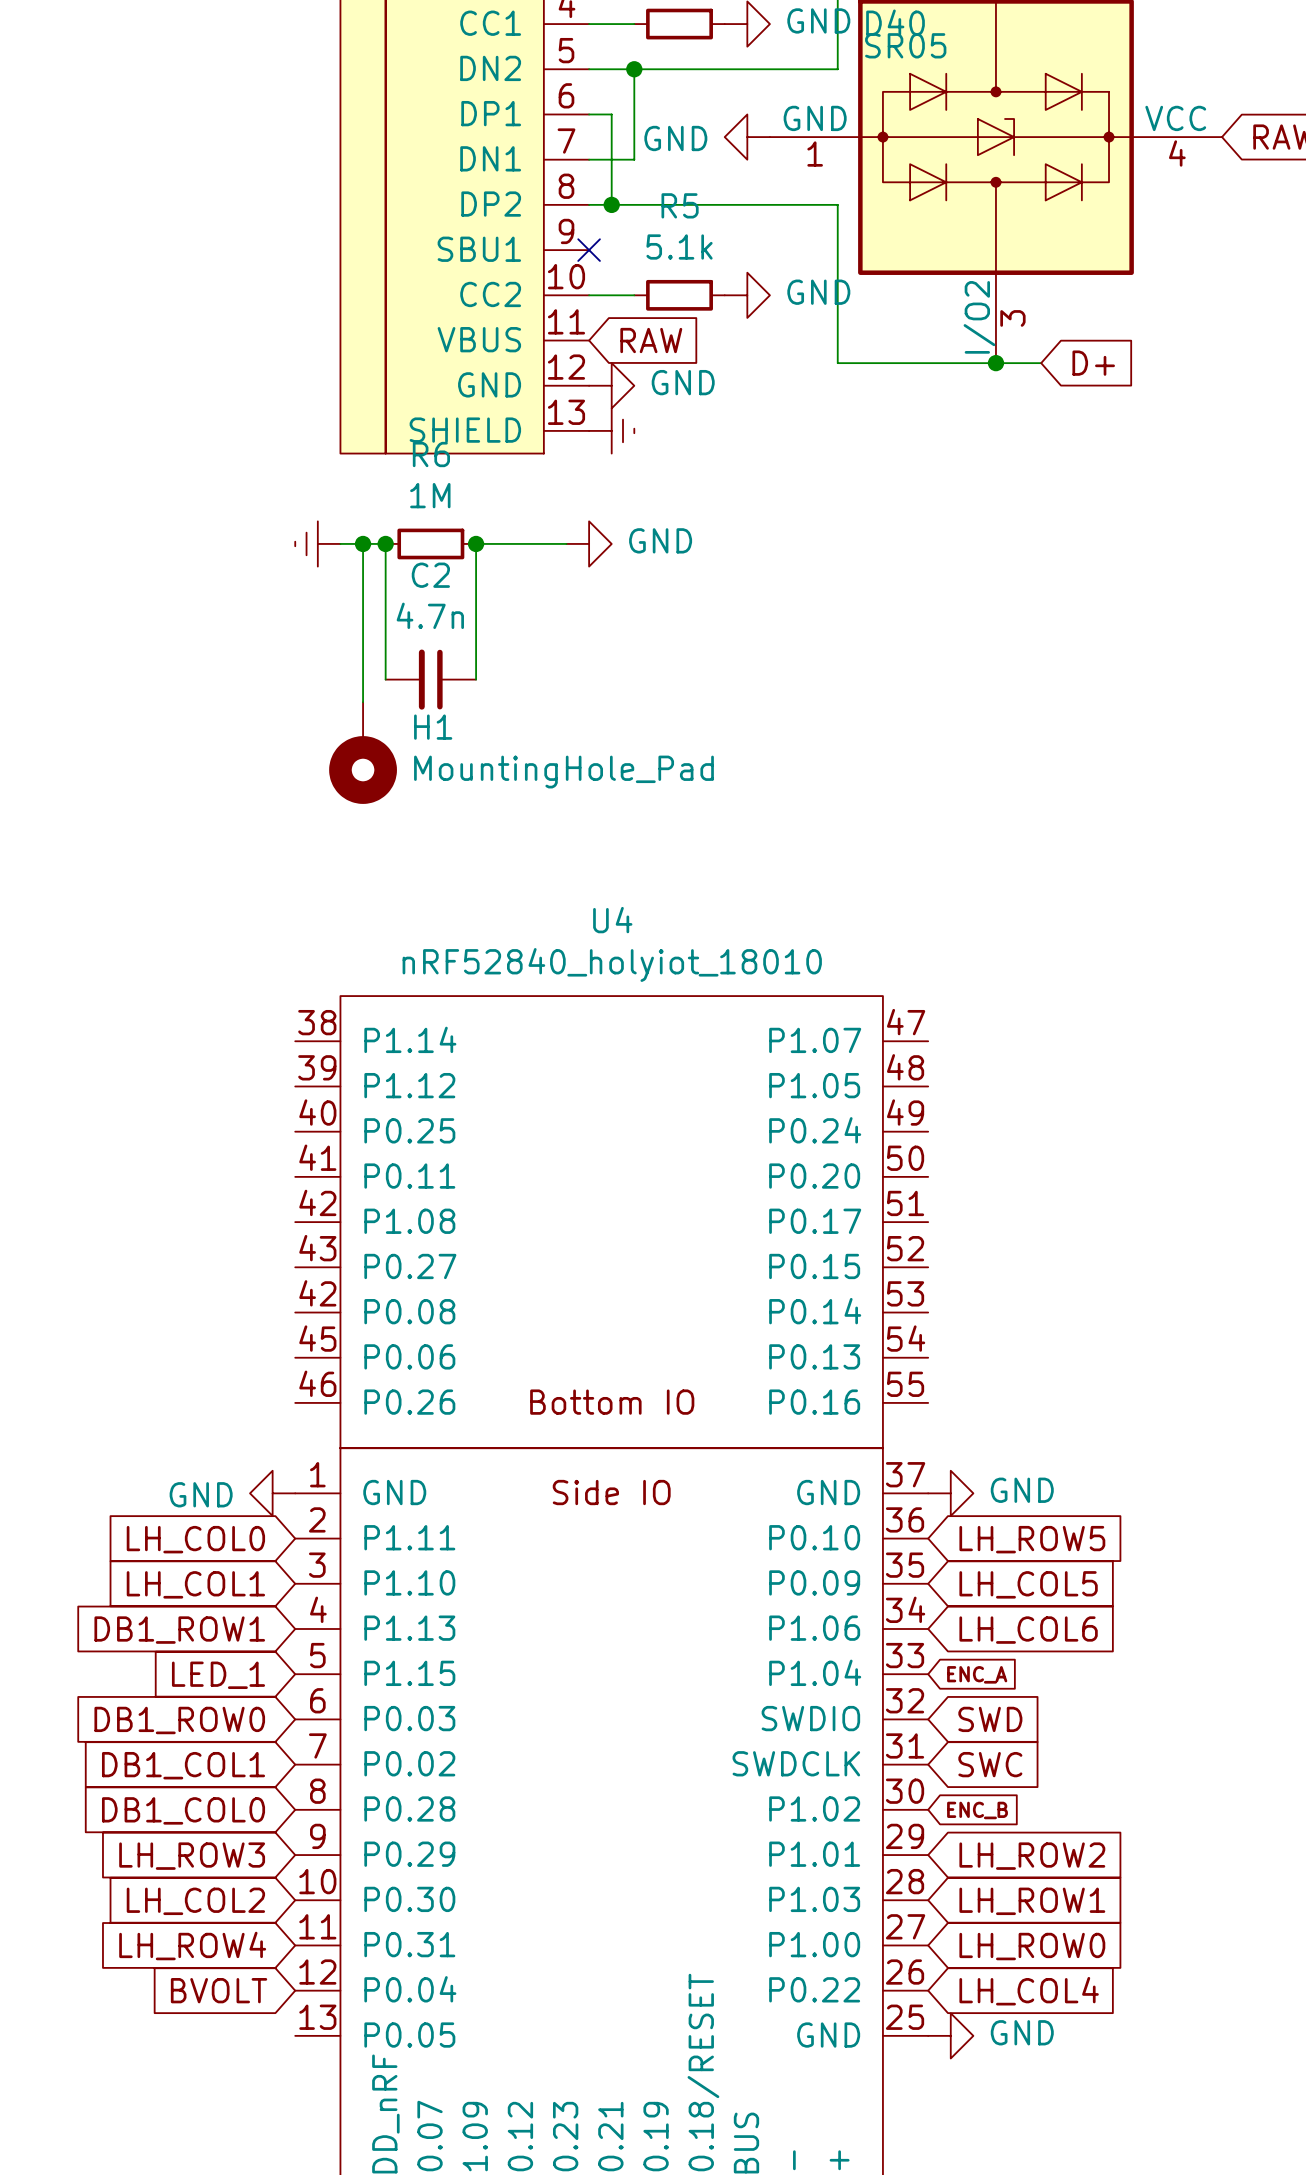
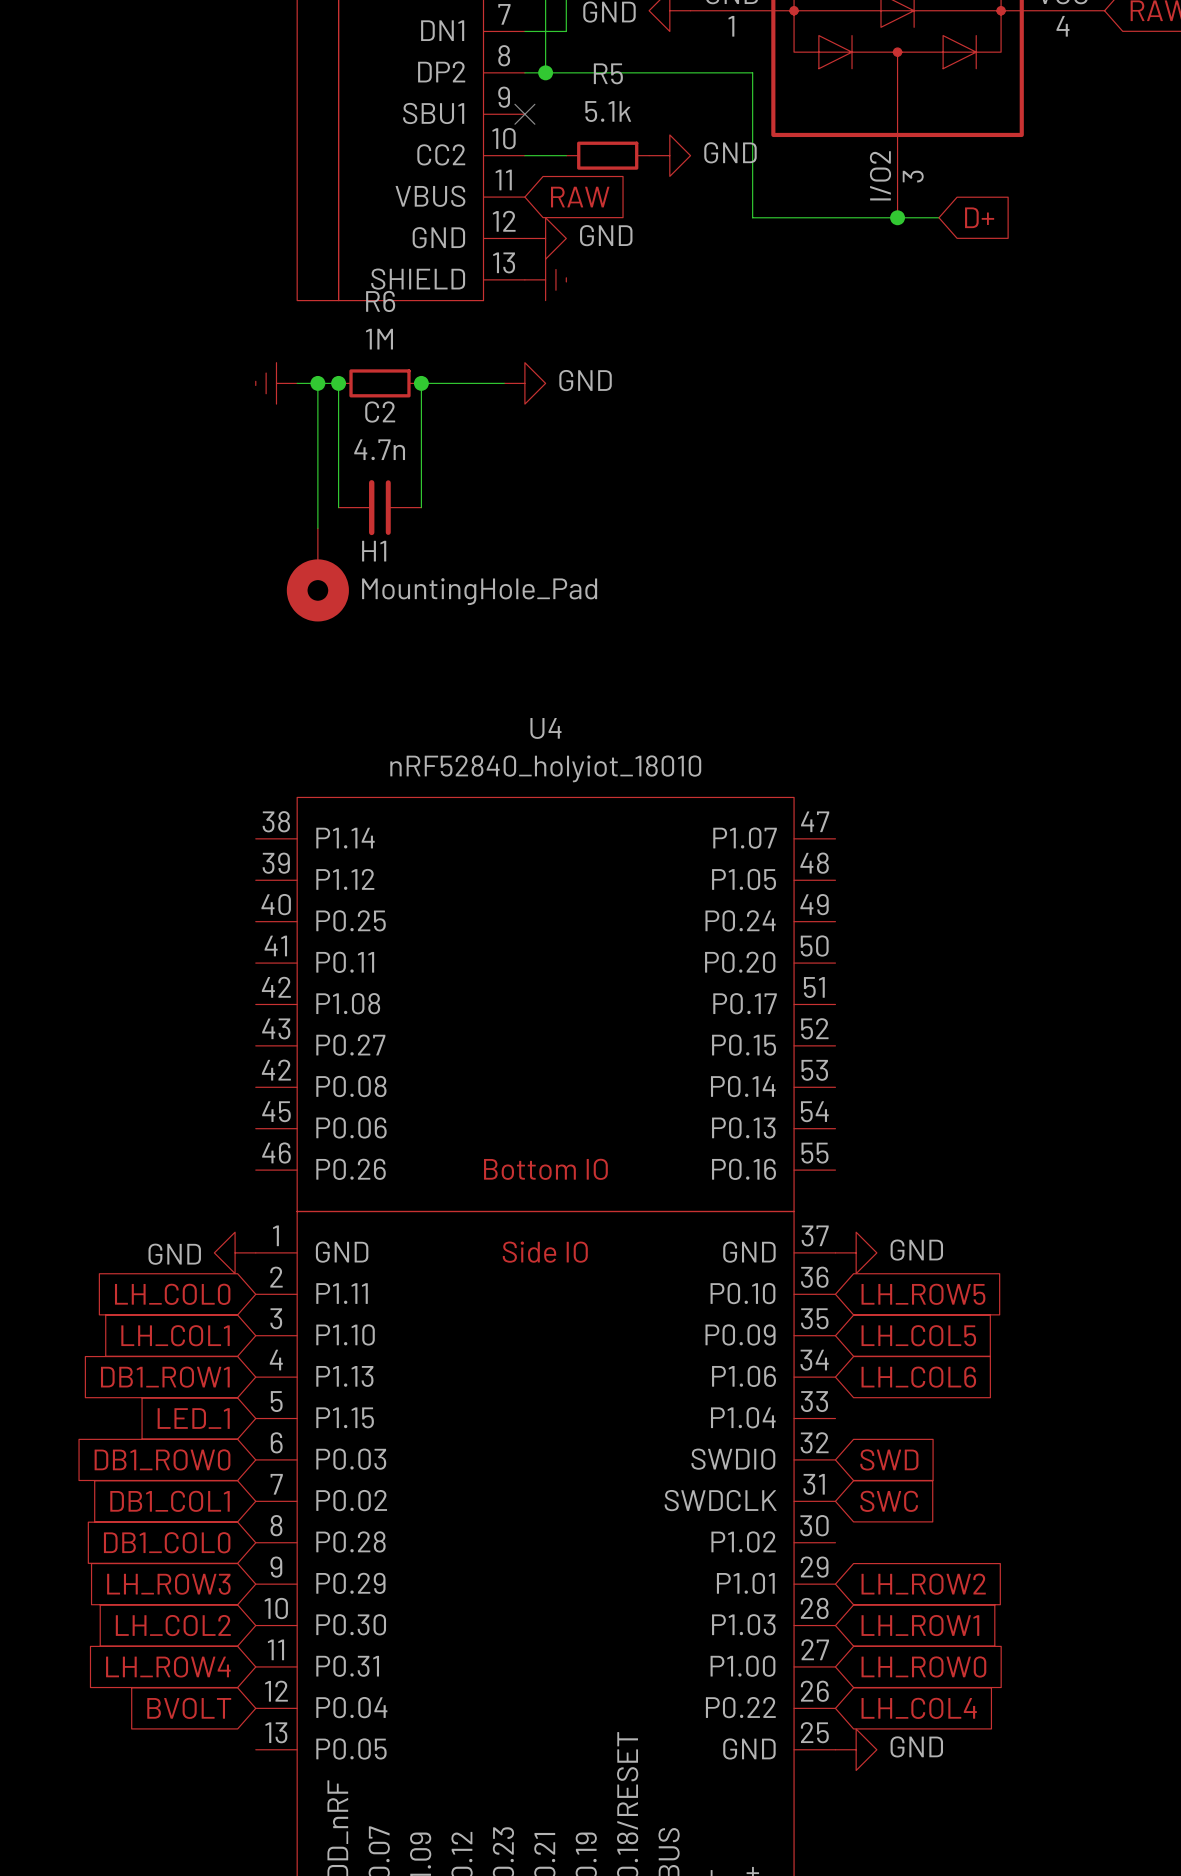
global label: ENC_A (977, 1674) -> none
global label: ENC_B (977, 1810) -> none

